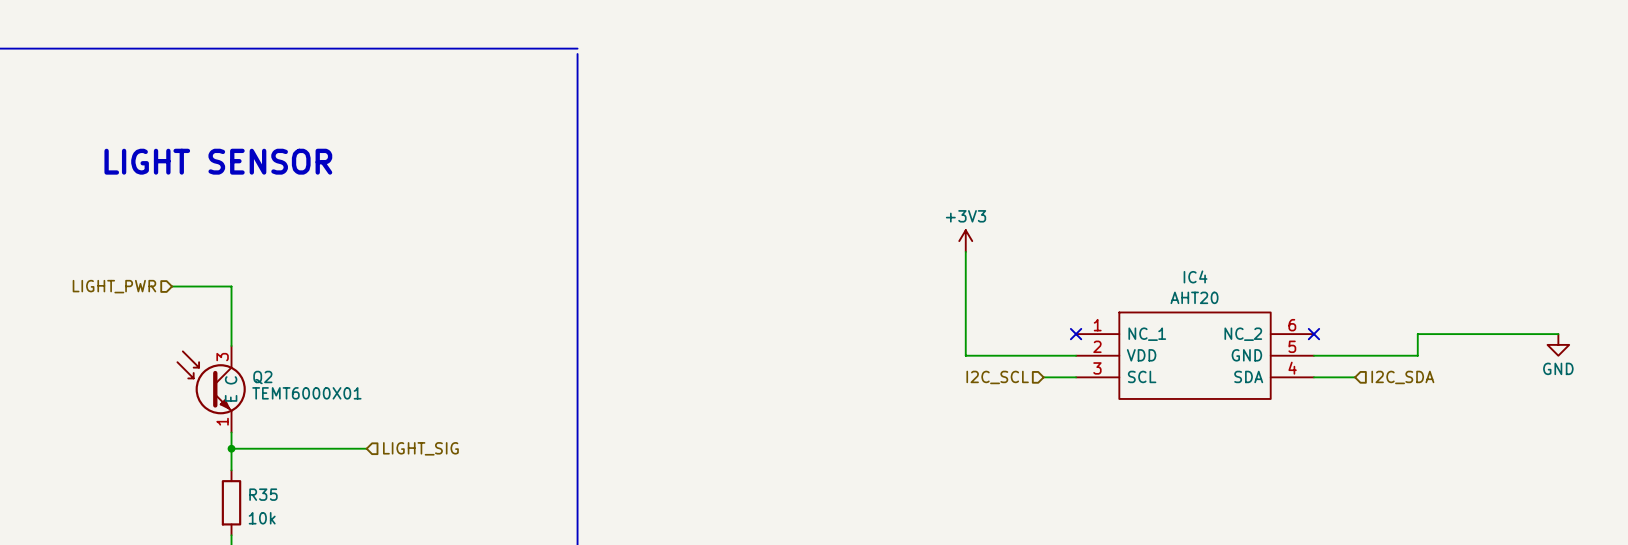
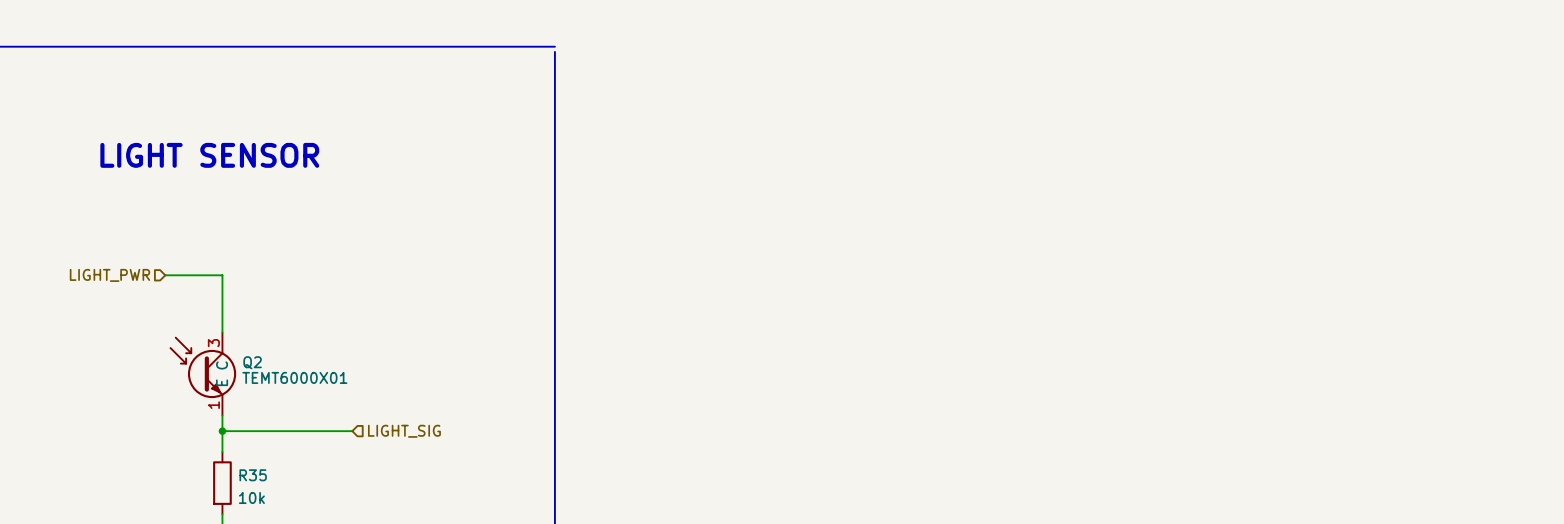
power symbol: +3V3 (965, 241) -> none
wire: (965, 251) (965, 355) (1076, 355) -> none
no-connect mark: (1076, 334) -> none
no-connect mark: (1313, 334) -> none
wire: (1558, 334) (1417, 334) (1417, 355) (1313, 355) -> none
power symbol: GND (1558, 344) -> none
IC4: AHT20 (1195, 355) -> none
hierarchical label: I2C_SCL (997, 377) -> none
wire: (1043, 377) (1076, 377) -> none
wire: (1313, 377) (1355, 377) -> none
hierarchical label: I2C_SDA (1402, 377) -> none

